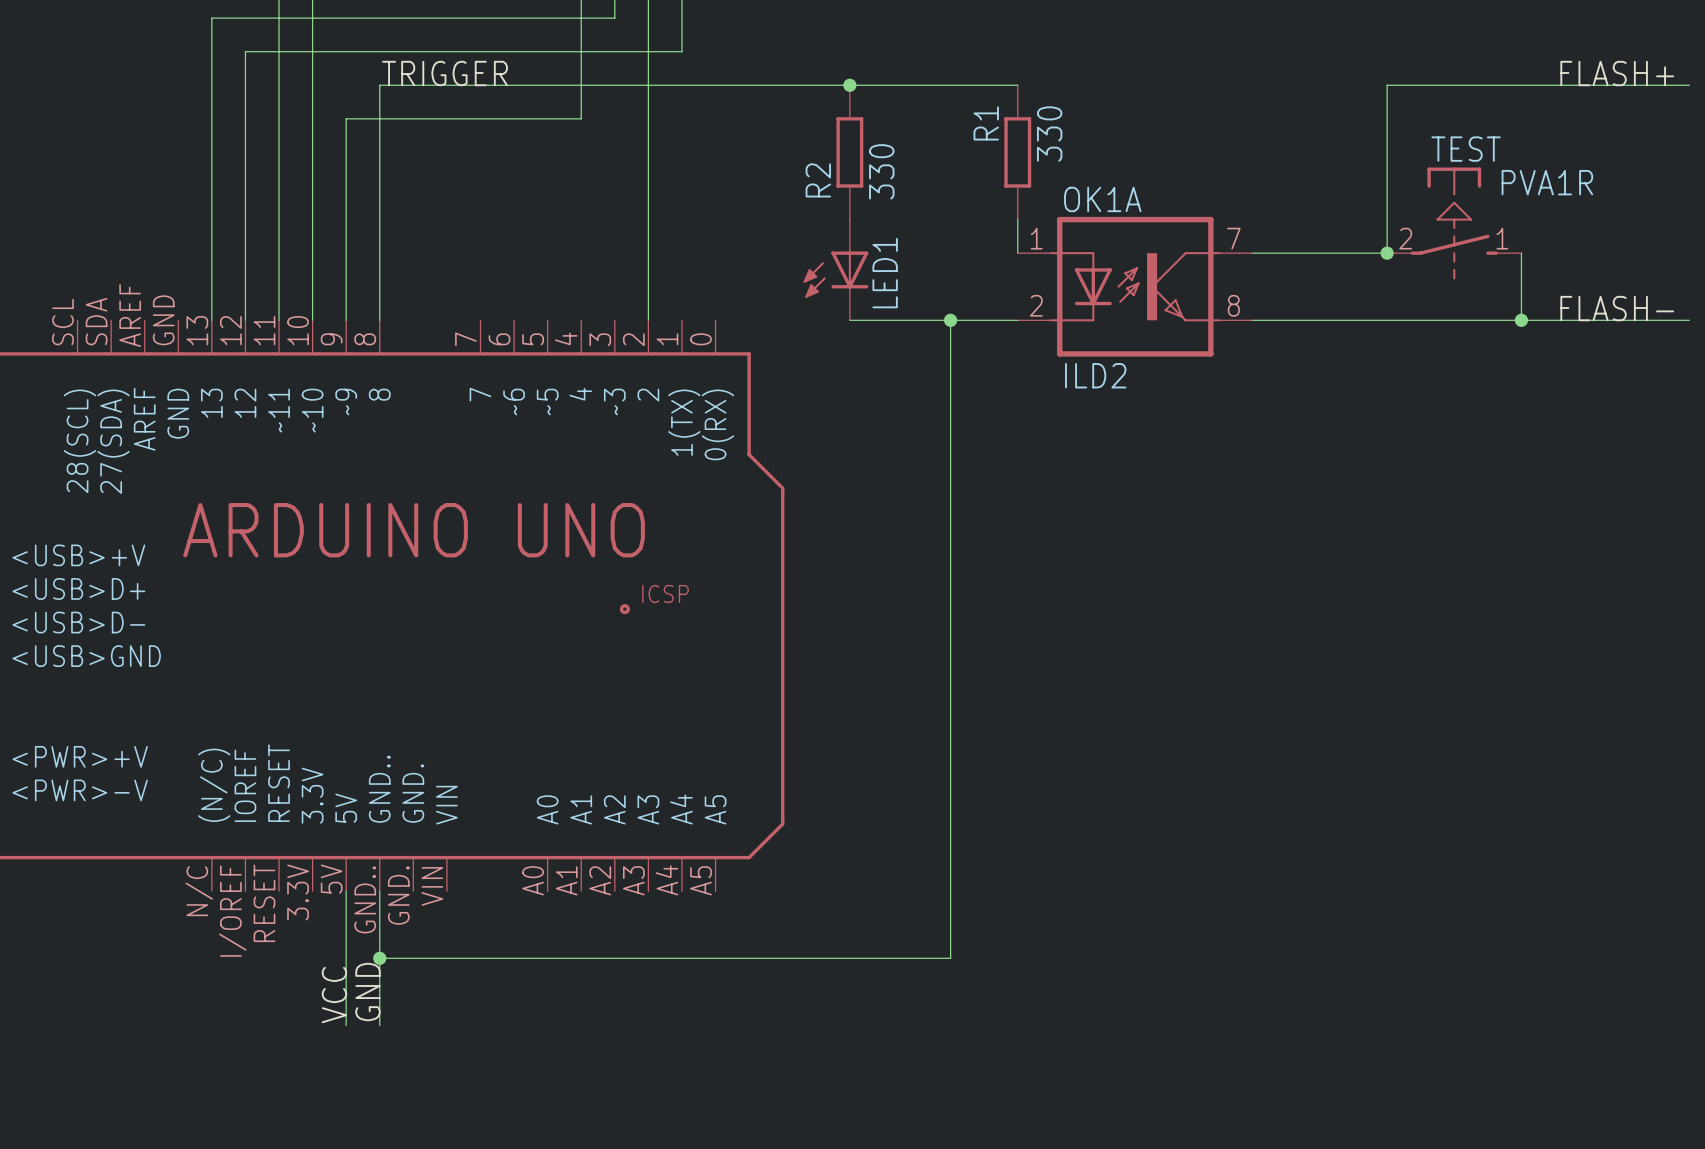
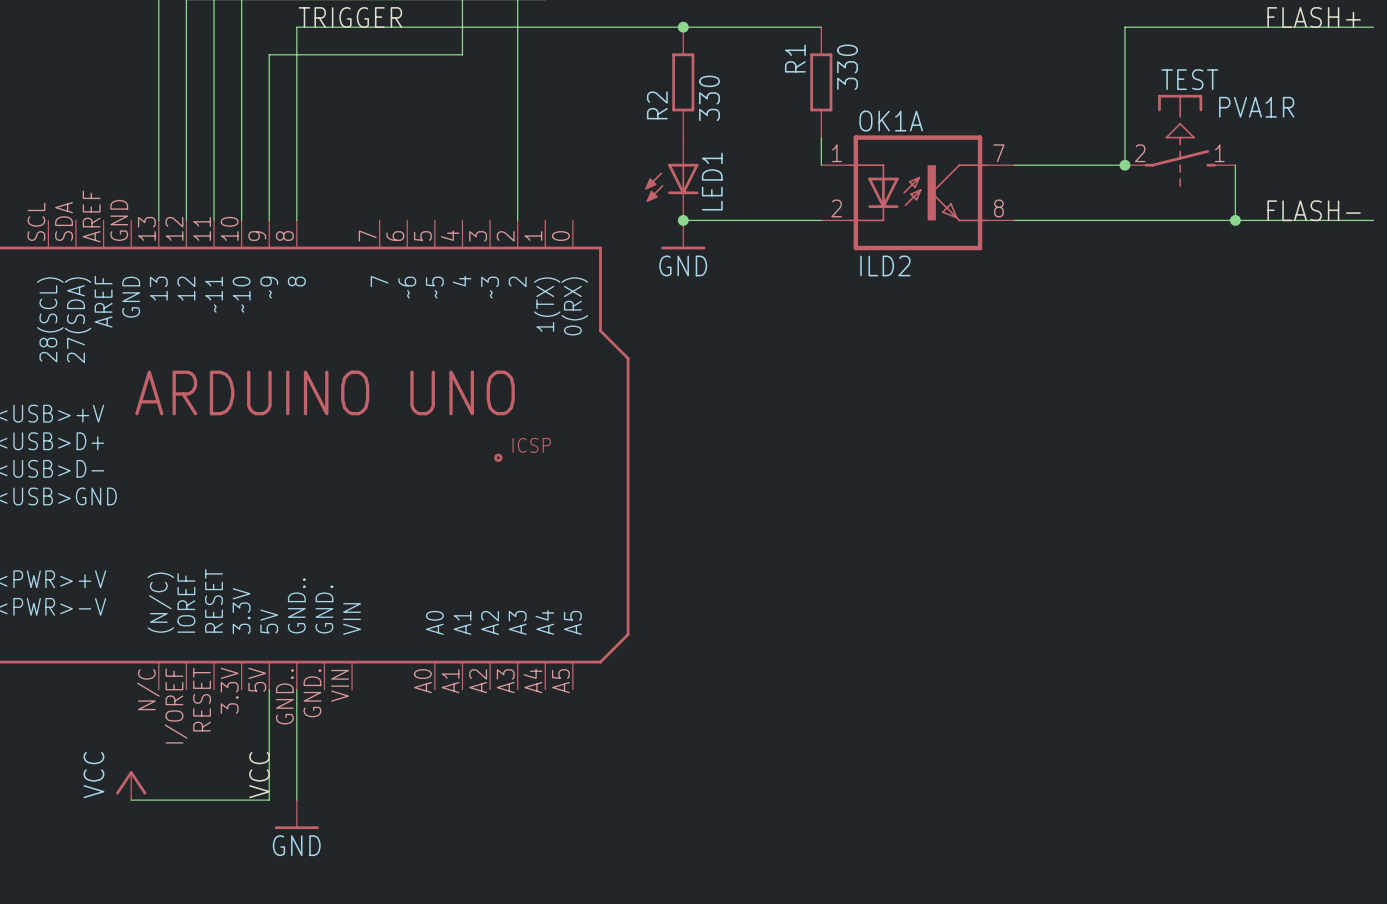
junction: none -> (683, 220)
wire: (950, 320) (950, 958) (379, 958) -> none
junction: (950, 320) -> none
power symbol: none -> GND (683, 234)
junction: (379, 958) -> none
label: GND (368, 992) -> none
power symbol: none -> VCC (131, 785)
wire: none -> (131, 800) (269, 800)
power symbol: none -> GND (296, 814)

